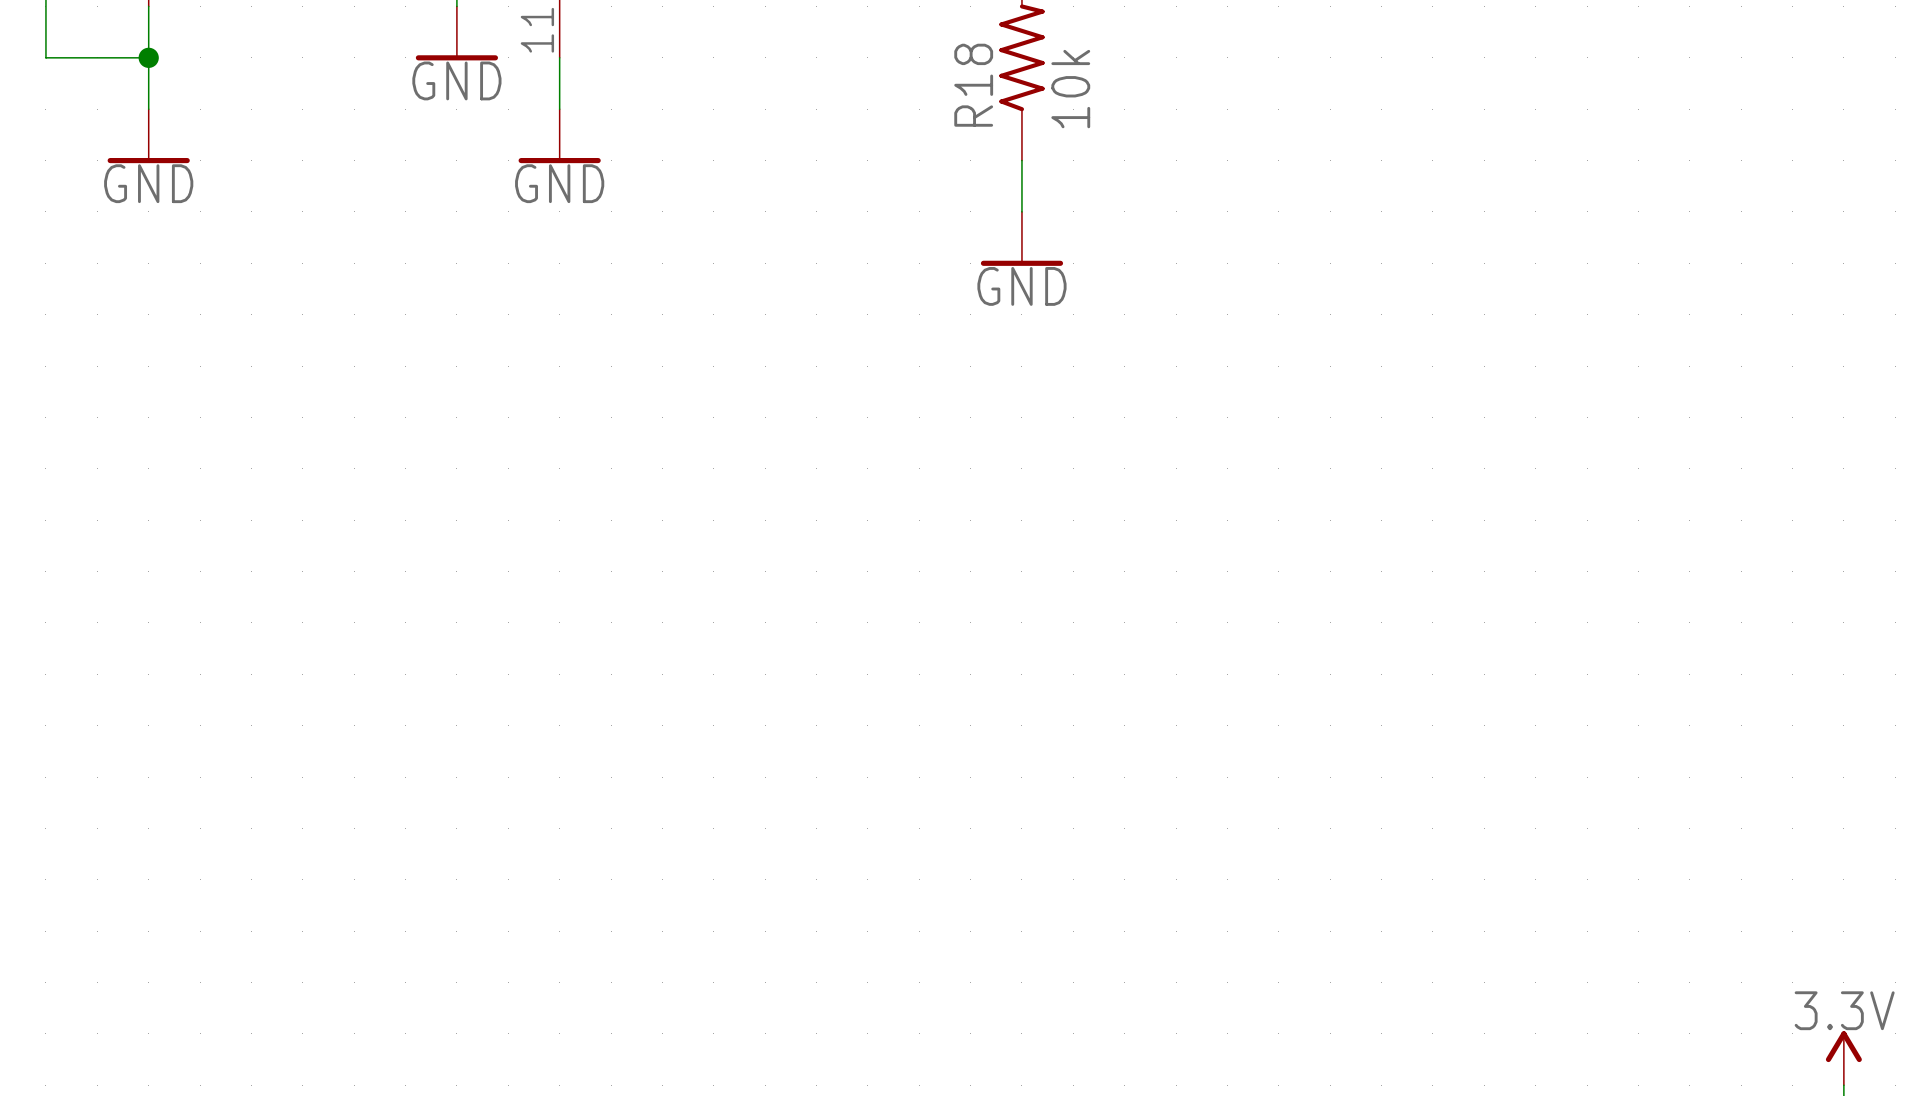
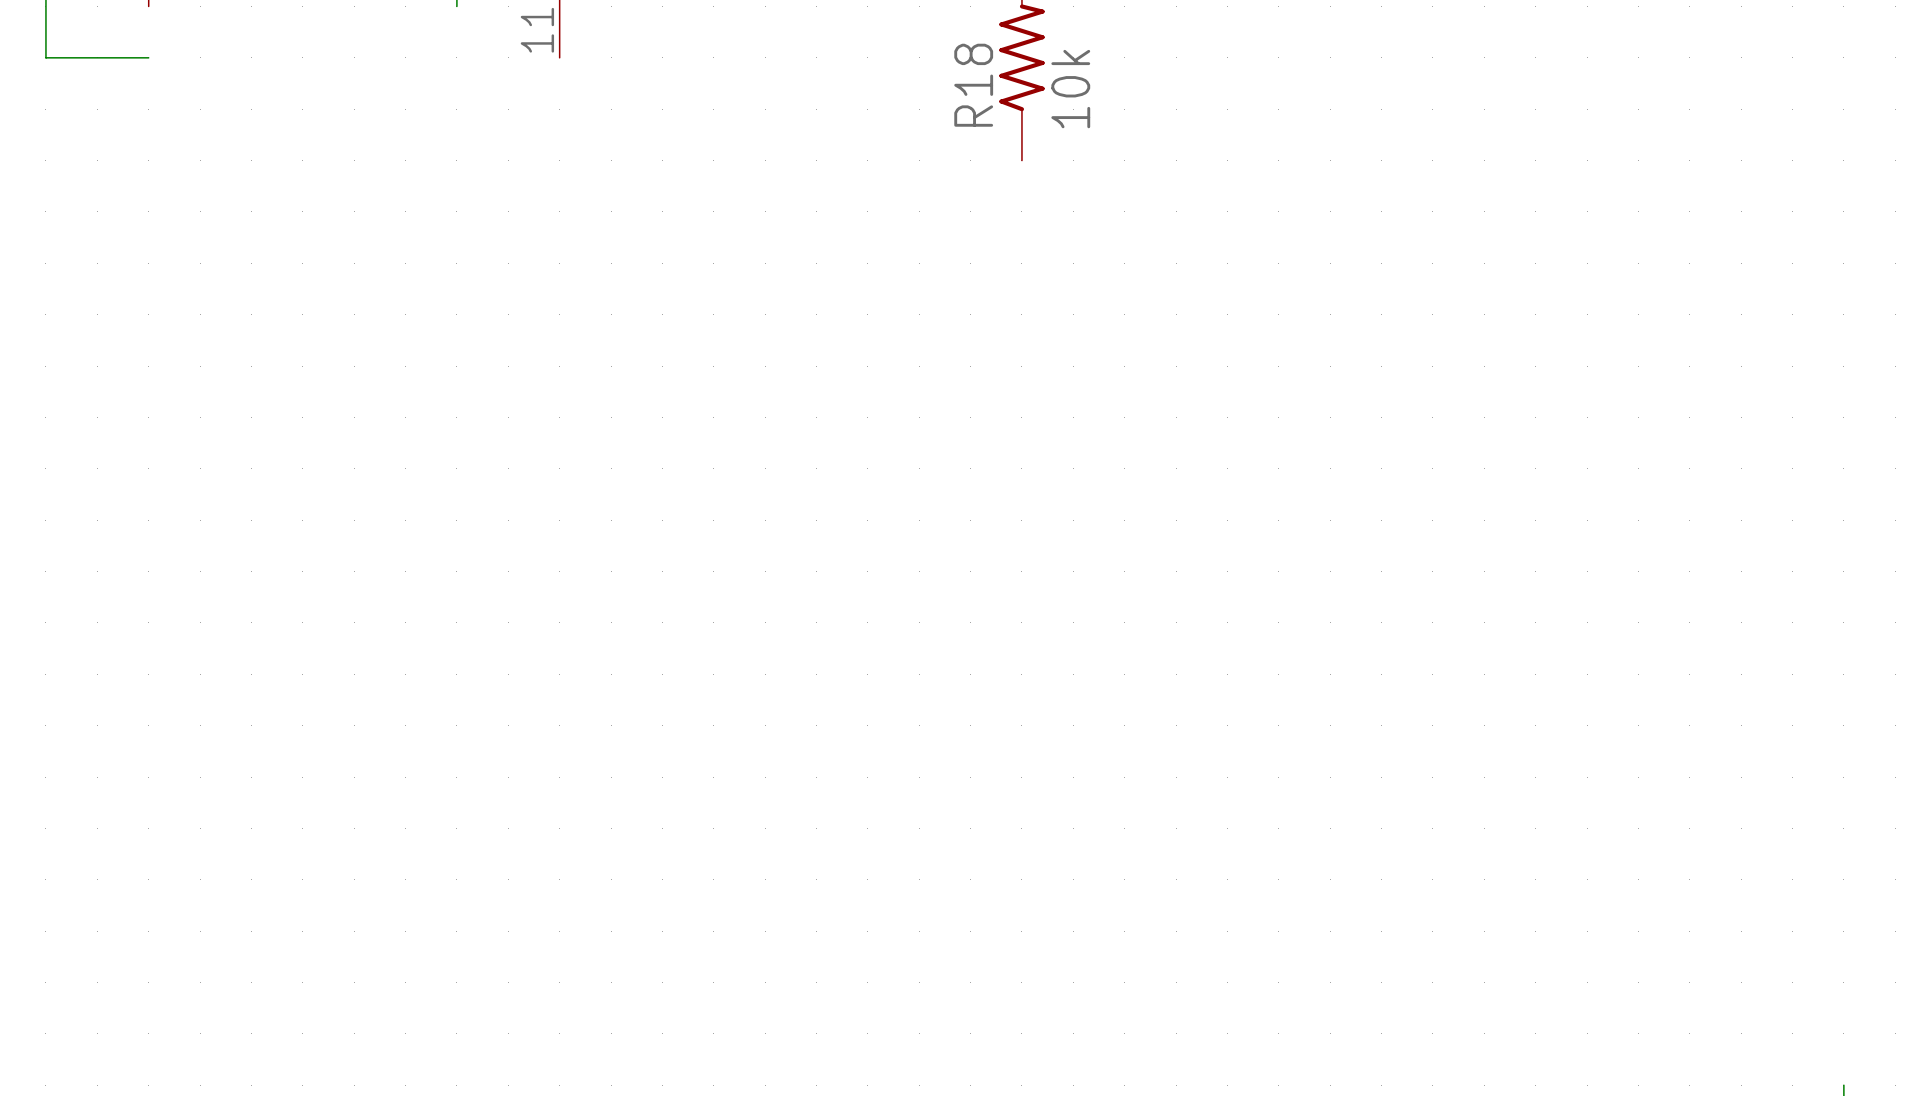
wire: (148, 6) (148, 109) -> none
power symbol: GND (456, 33) -> none
junction: (148, 57) -> none
wire: (559, 57) (559, 109) -> none
power symbol: GND (148, 136) -> none
power symbol: GND (559, 136) -> none
wire: (1021, 160) (1021, 211) -> none
power symbol: GND (1021, 238) -> none
power symbol: 3.3V (1843, 1058) -> none

